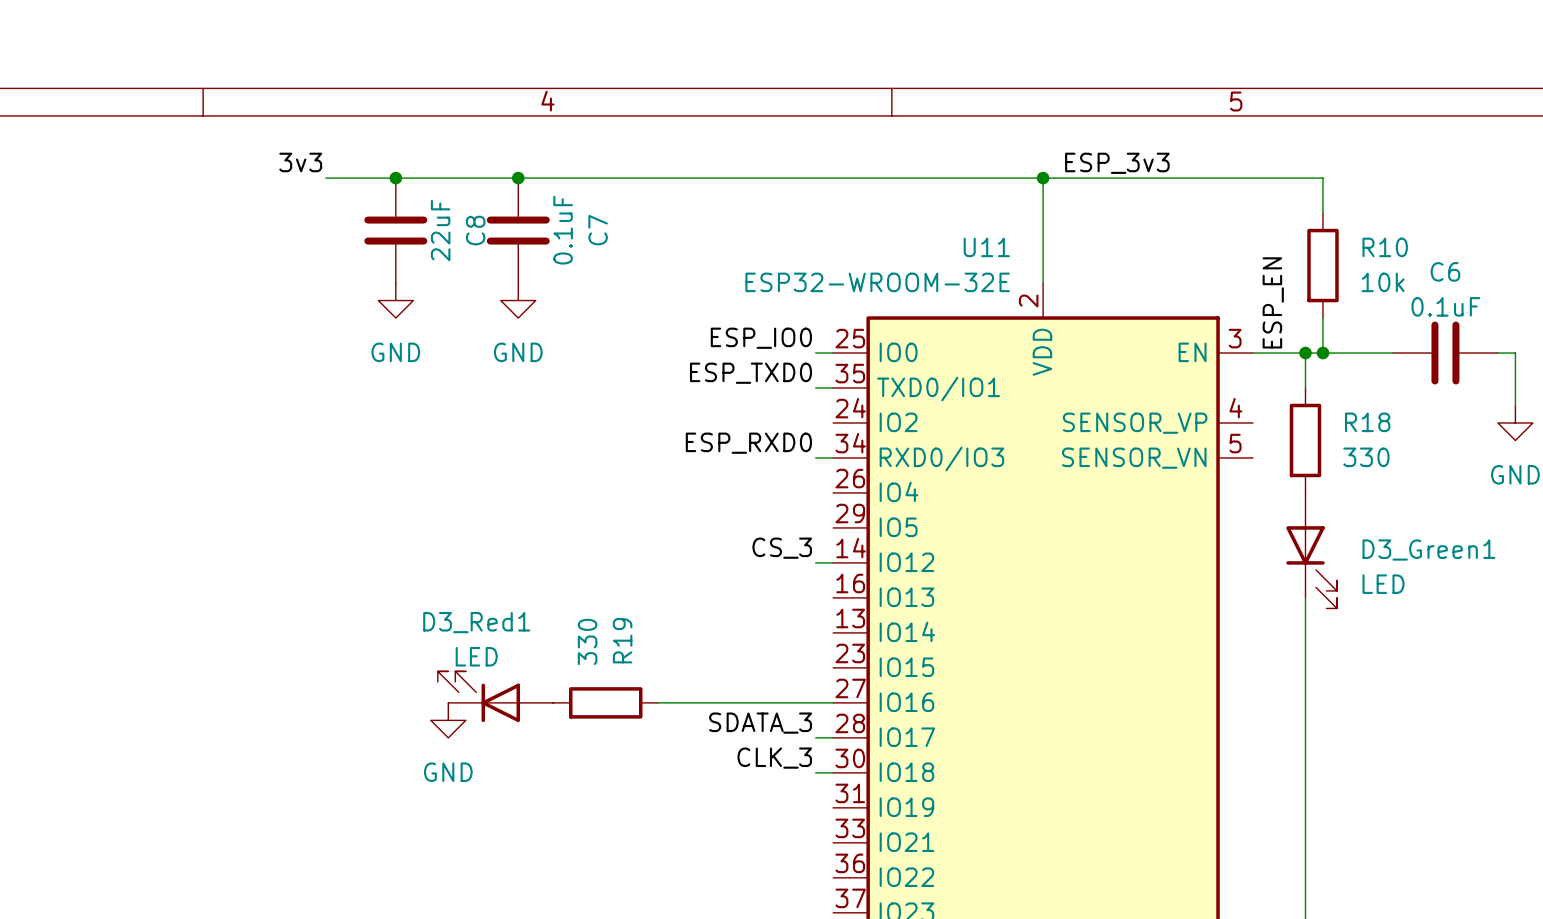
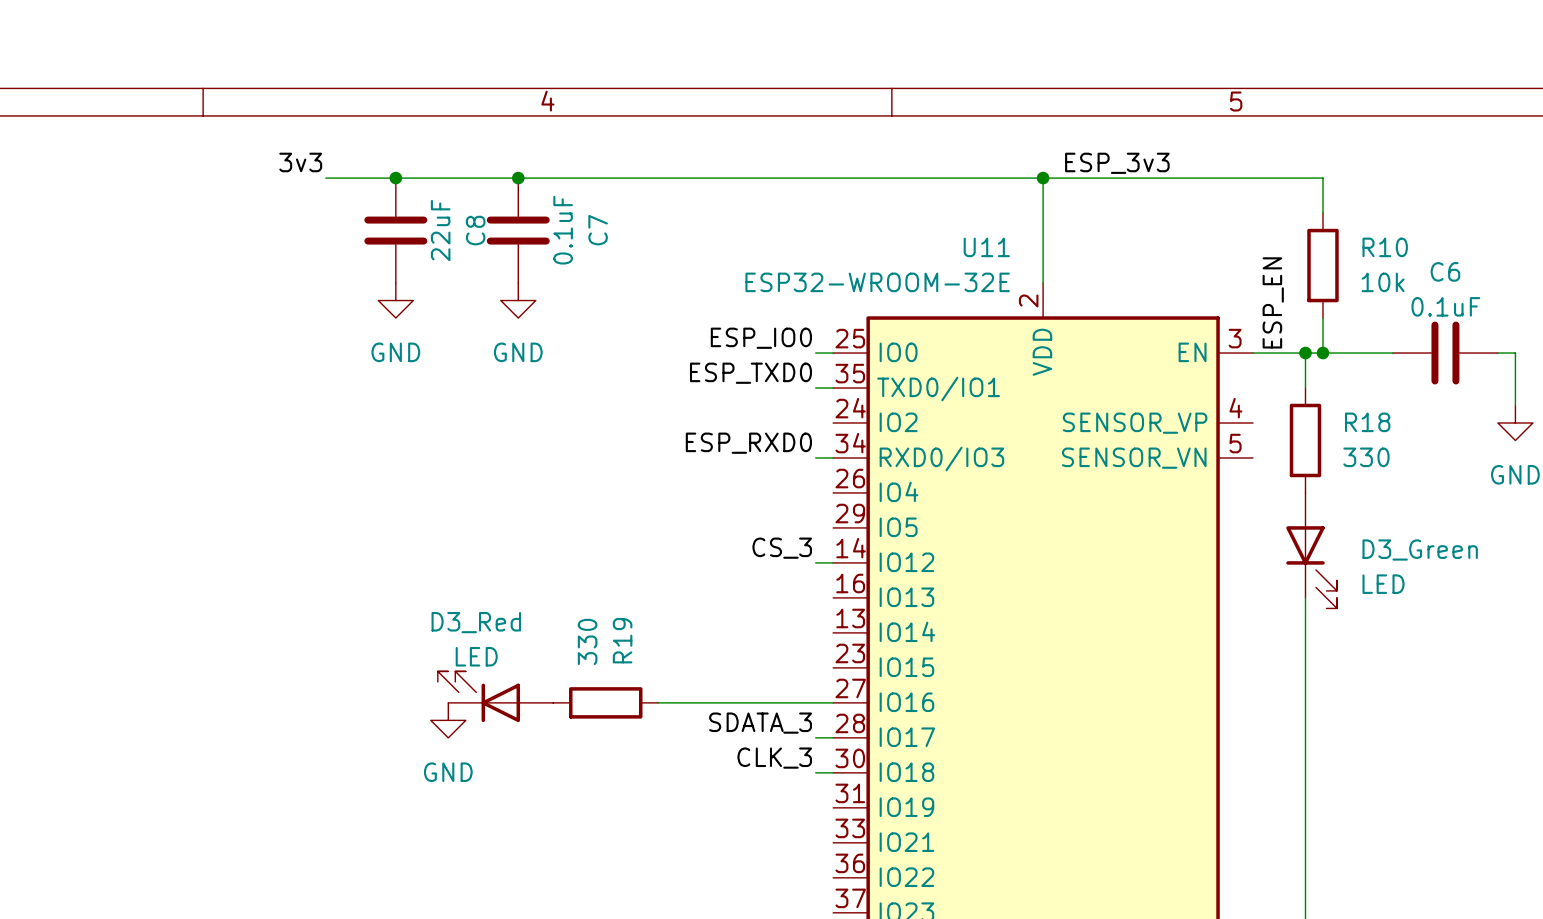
D3_Green1 name: D3_Green1 (1428, 550) -> D3_Green (1420, 550)
D3_Red1 name: D3_Red1 (476, 622) -> D3_Red (476, 622)

